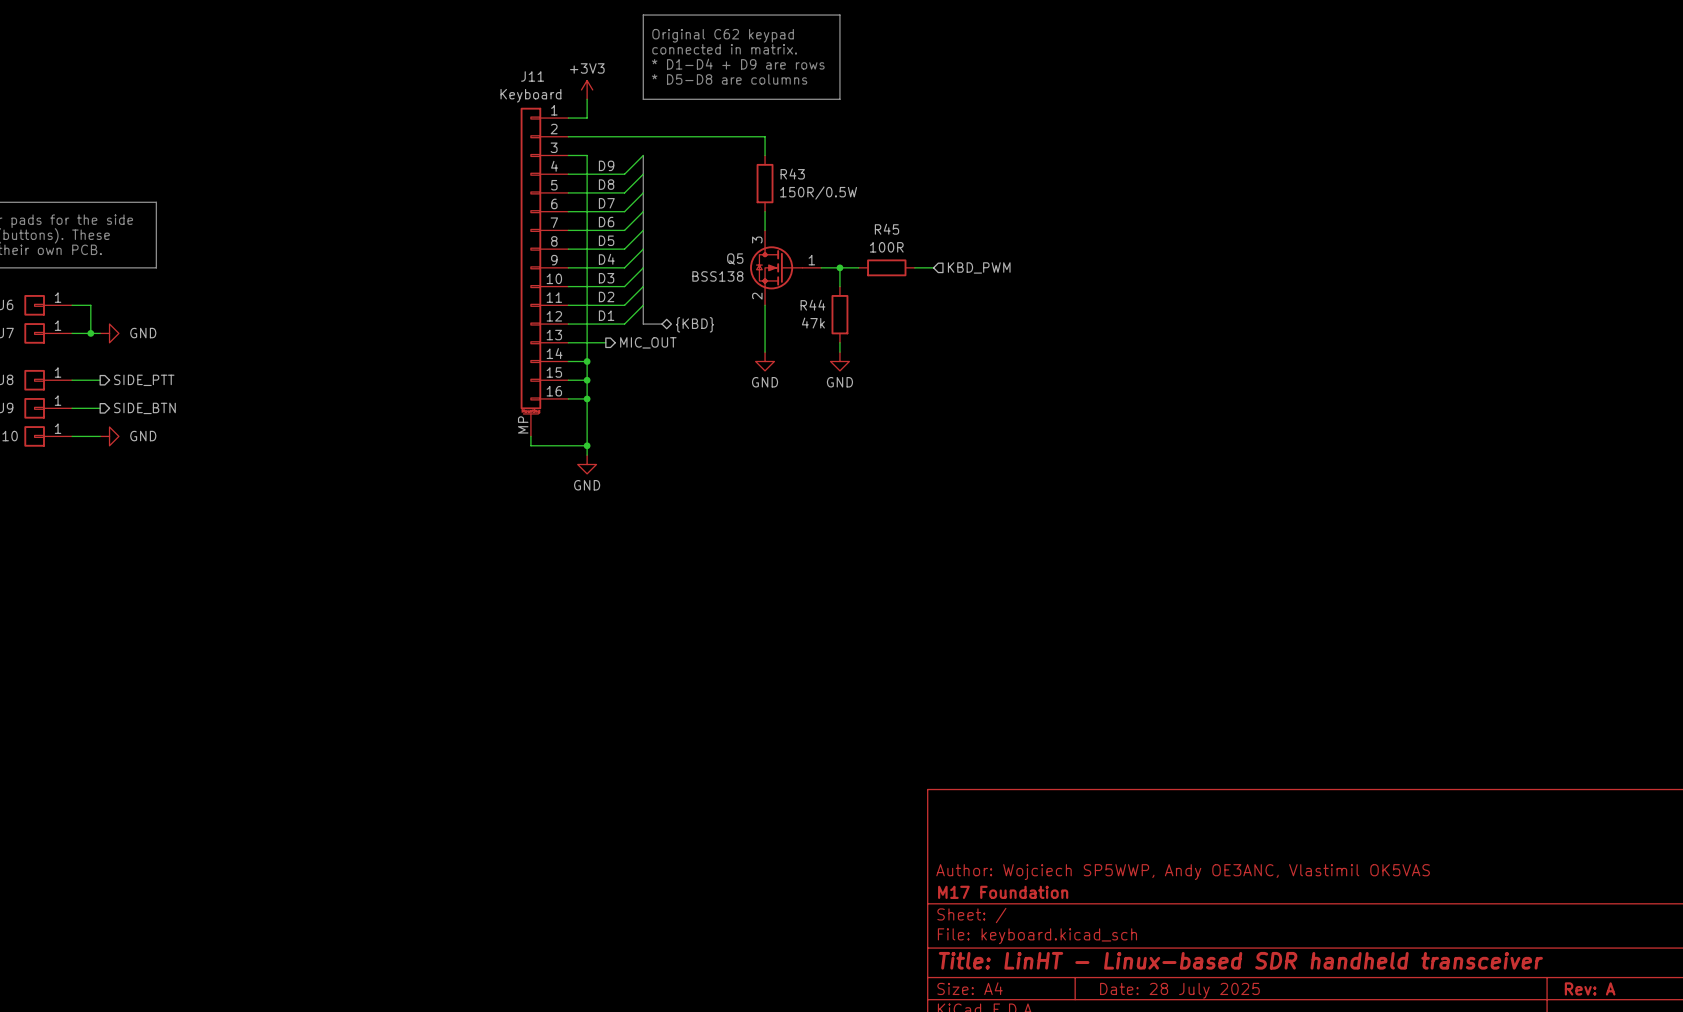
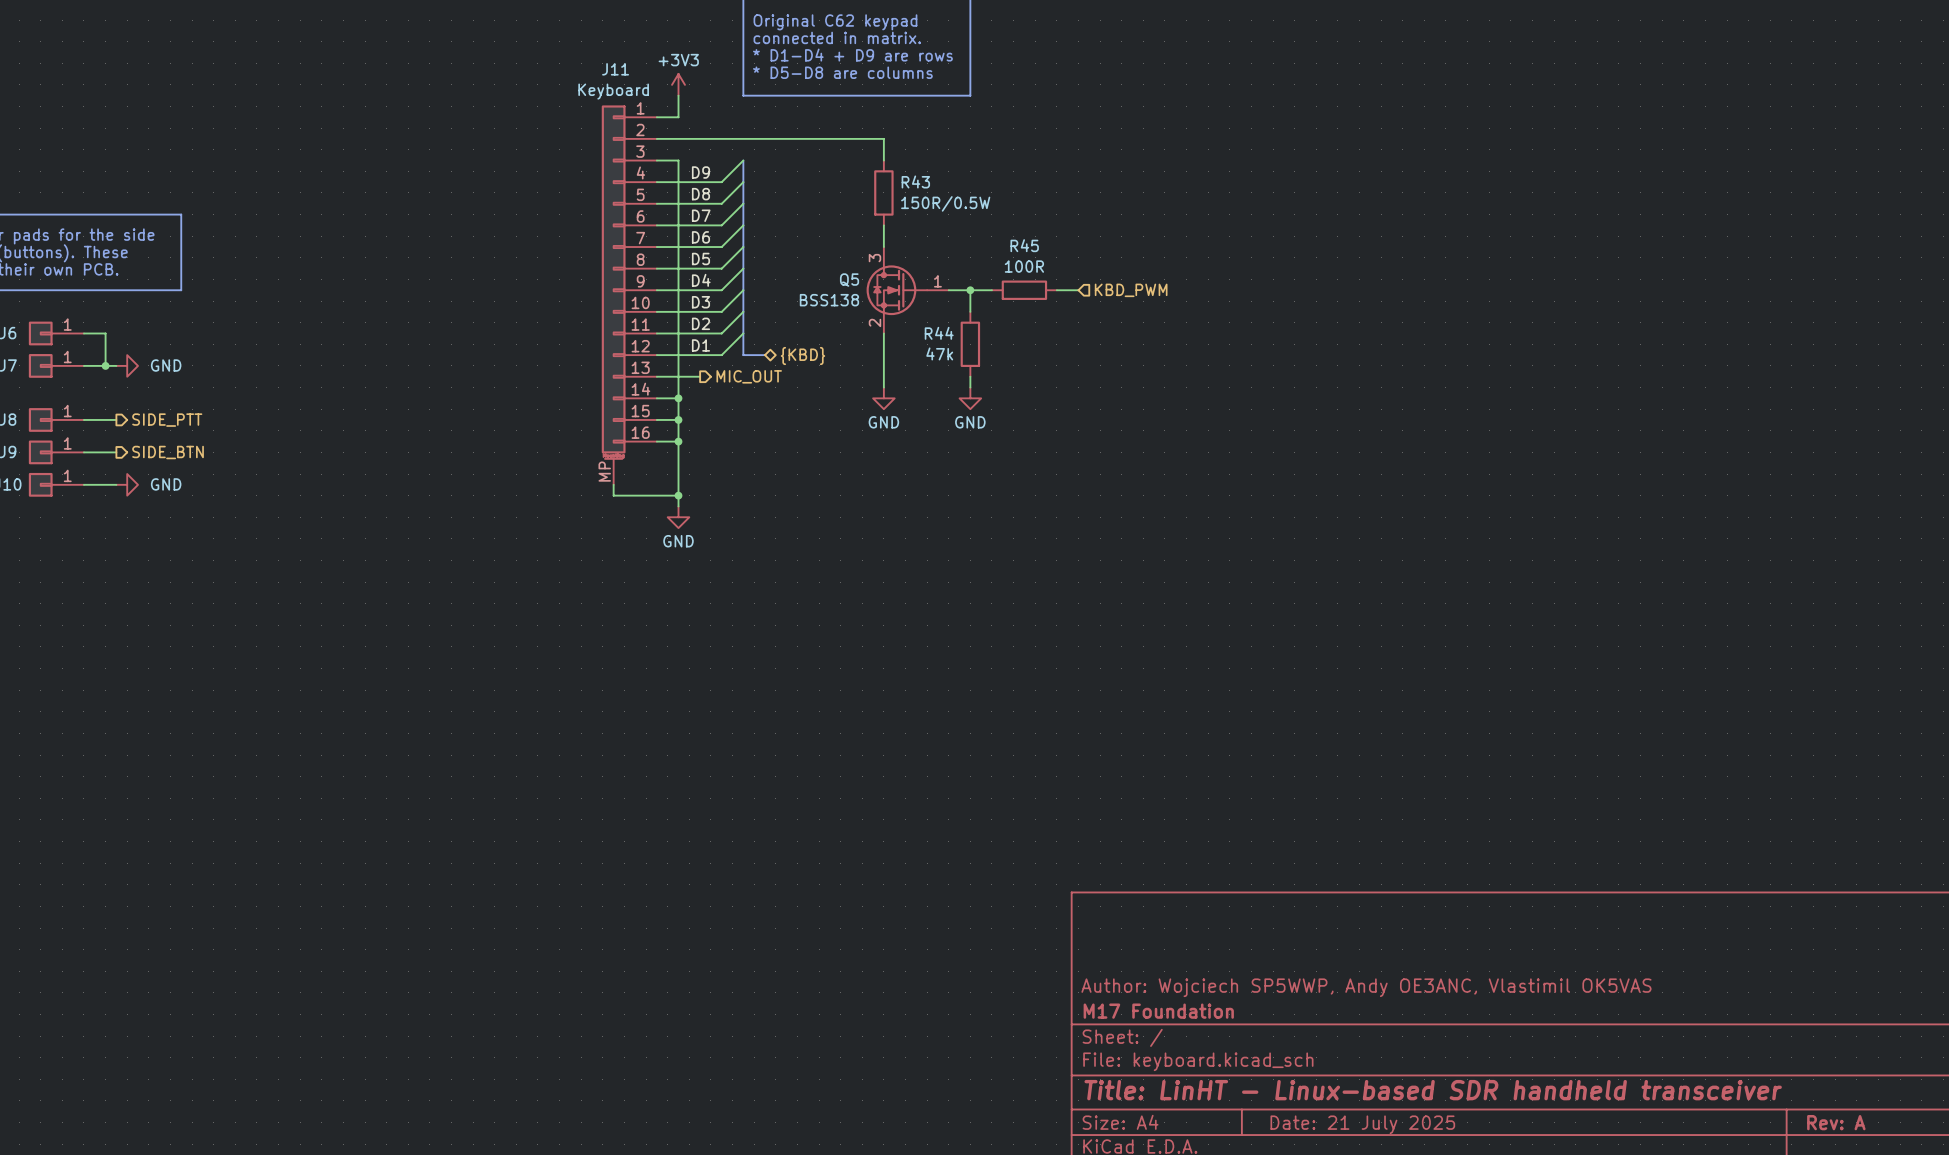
title block: Date: 28 July 2025 (1179, 990) -> Date: 21 July 2025 (1362, 1124)

